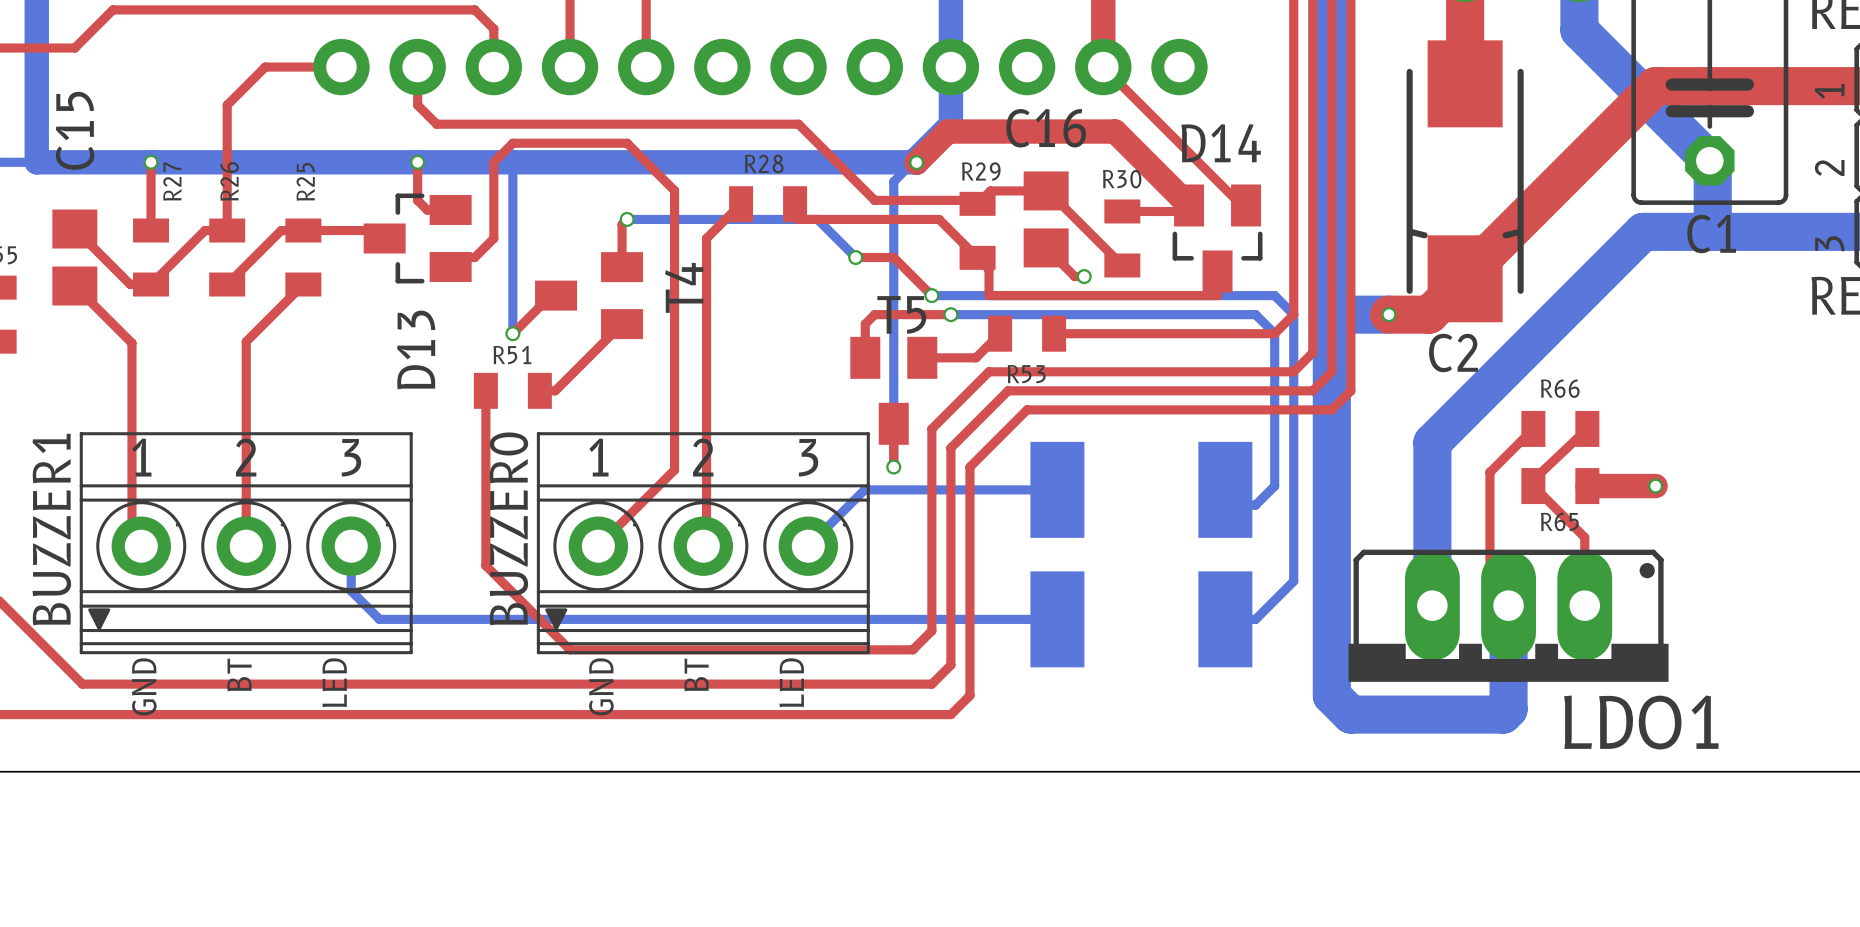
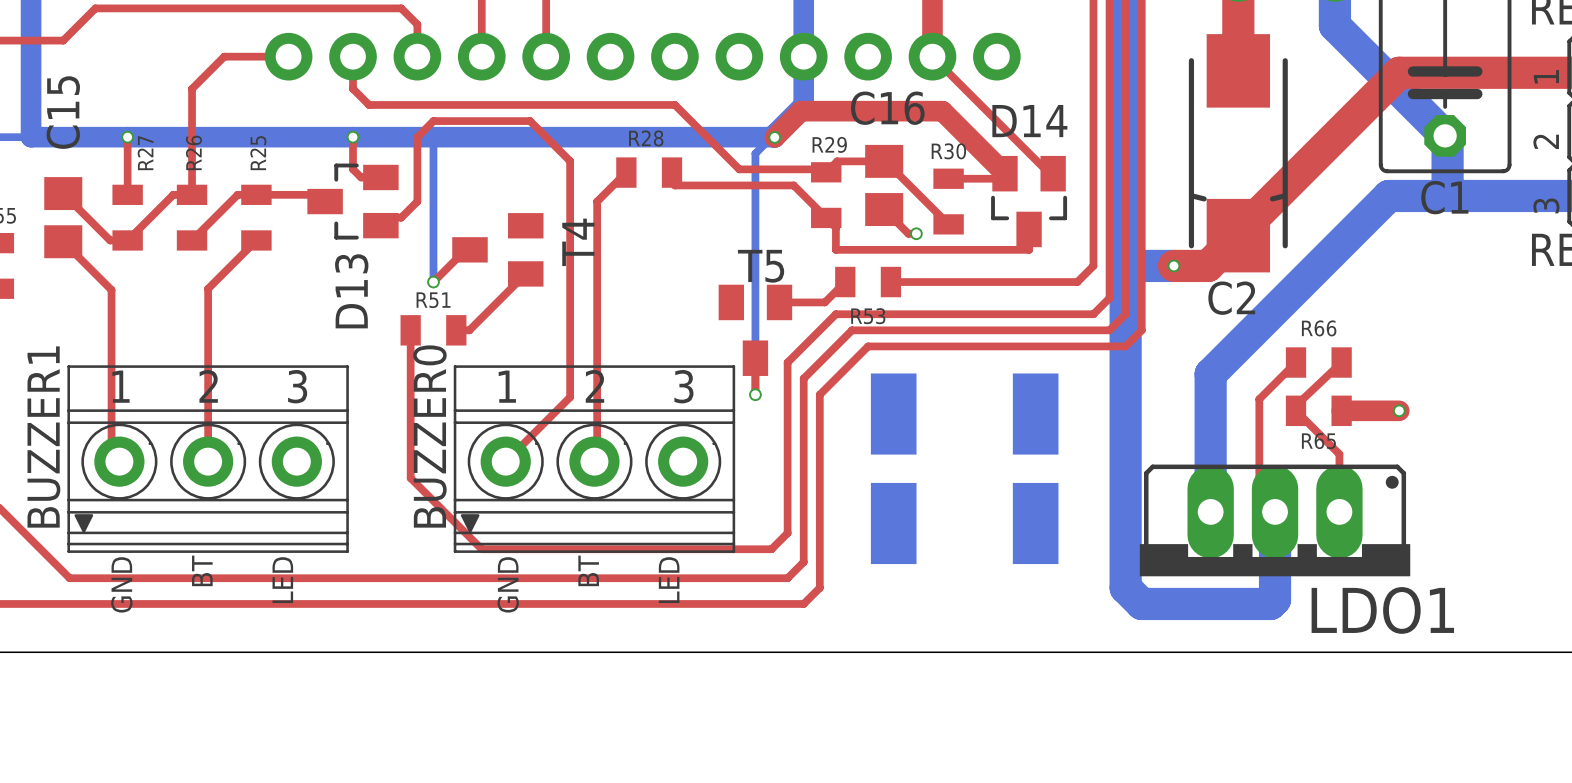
top track: (627, 219) (622, 224) (622, 267) -> none
bottom track: (627, 219) (817, 219) (855, 257) -> none
via: (627, 219) -> none
top track: (855, 257) (893, 257) (931, 295) -> none
via: (855, 257) -> none
bottom track: (931, 295) (1274, 295) (1293, 314) (1293, 581) (1255, 619) (1225, 619) -> none
via: (931, 295) -> none
top track: (950, 314) (874, 314) (865, 324) (865, 357) -> none
bottom track: (950, 314) (1255, 314) (1274, 333) (1274, 486) (1255, 505) (1240, 505) (1225, 489) -> none
via: (950, 314) -> none
bottom track: (1057, 489) (864, 489) (808, 546) -> none
bottom track: (351, 546) (351, 591) (379, 619) (1057, 619) -> none

